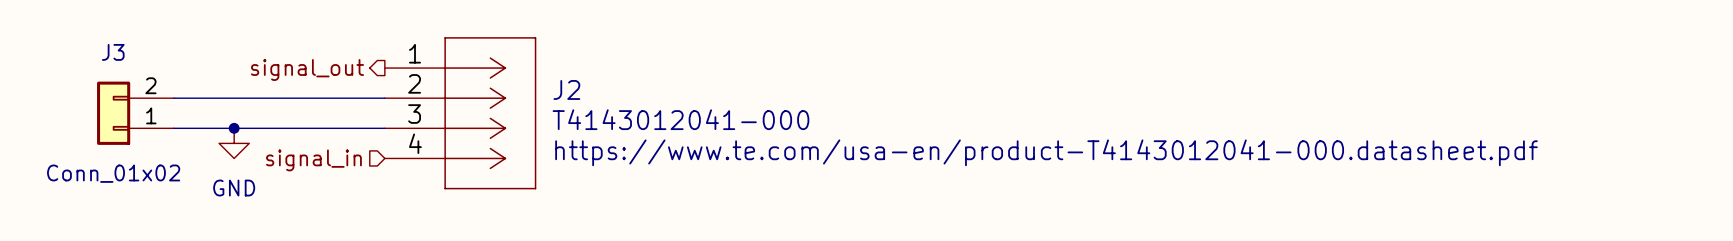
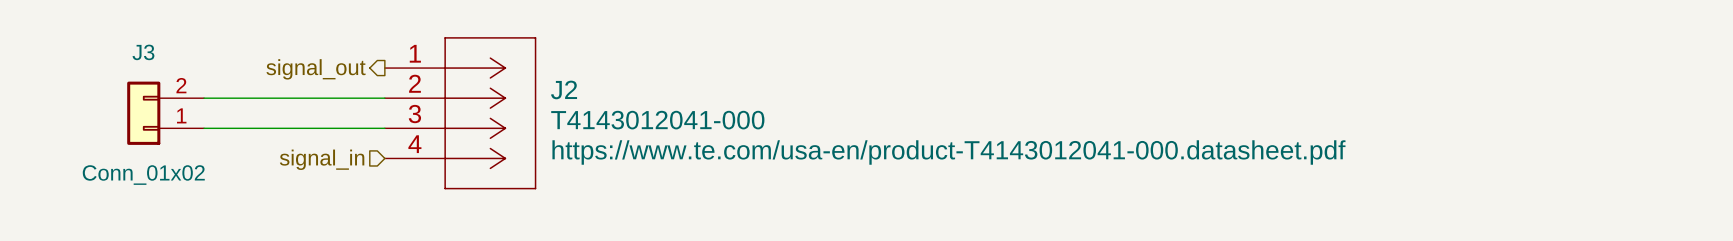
J3 position: (135, 113) -> (165, 113)
junction: (234, 128) -> none
power symbol: GND (234, 143) -> none

